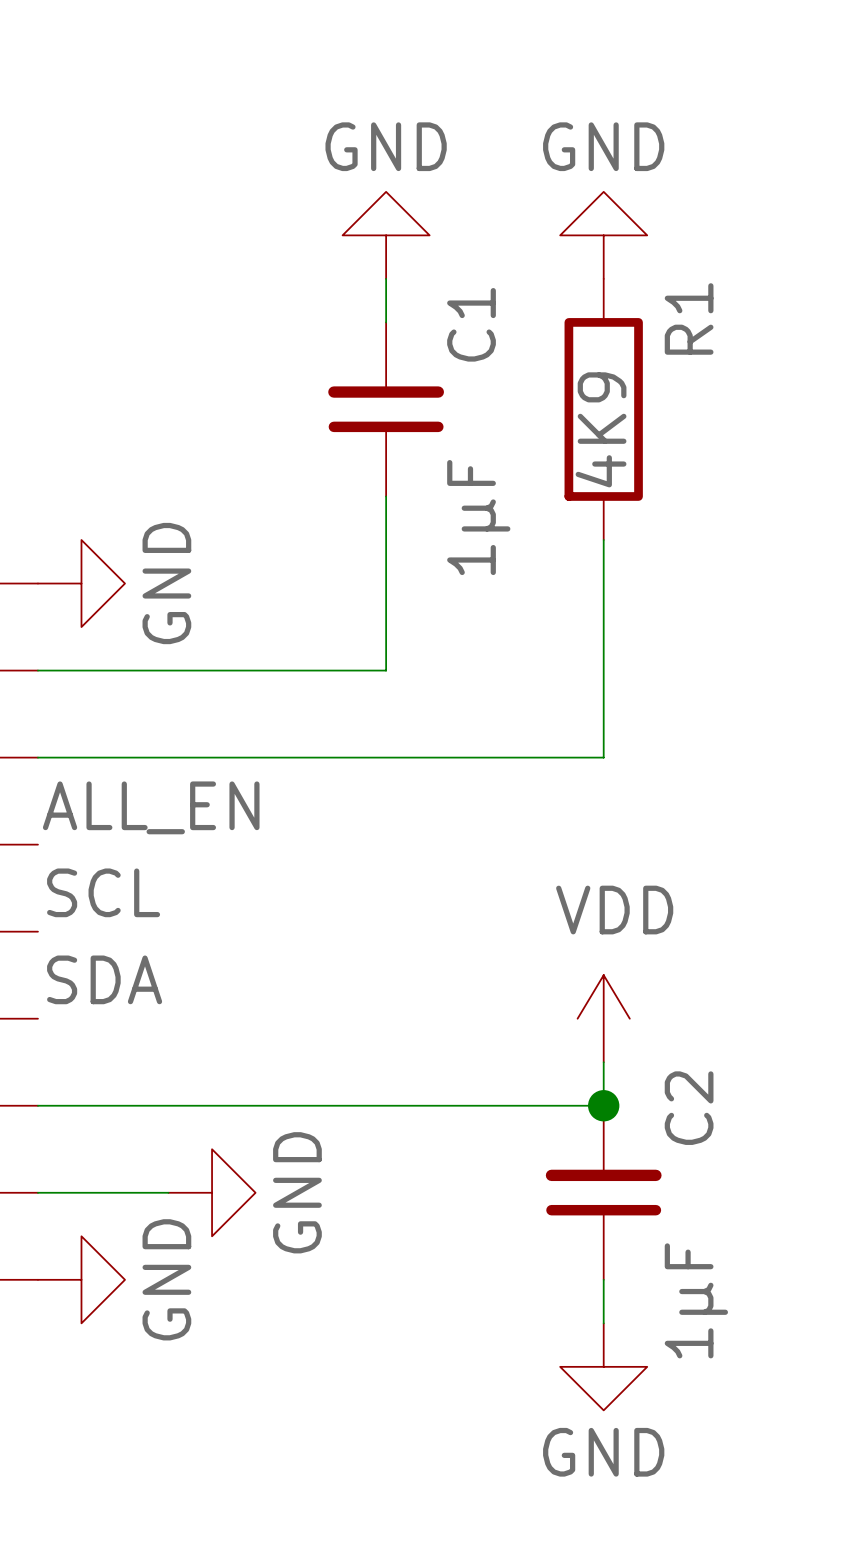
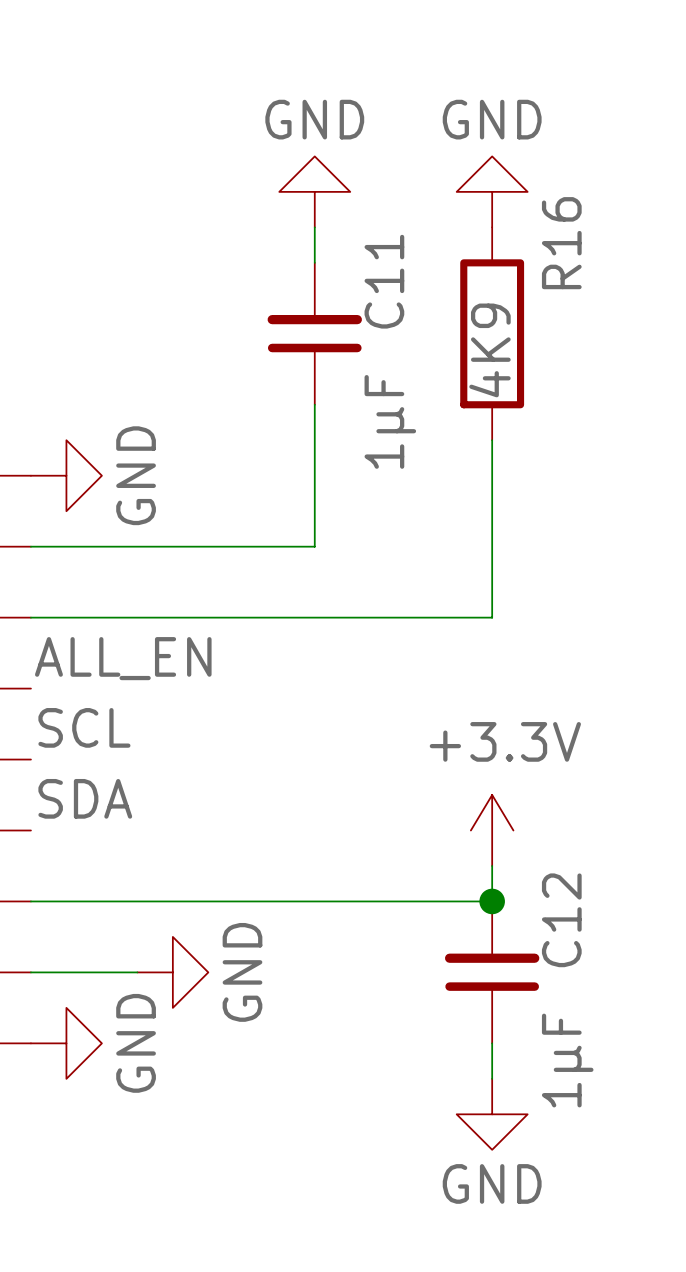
R1 name: R1 (689, 318) -> R16 (561, 243)
C1 name: C1 (471, 324) -> C11 (384, 281)
power symbol: VDD (603, 1018) -> +3.3V (492, 830)
C2 name: C2 (689, 1108) -> C12 (561, 920)

